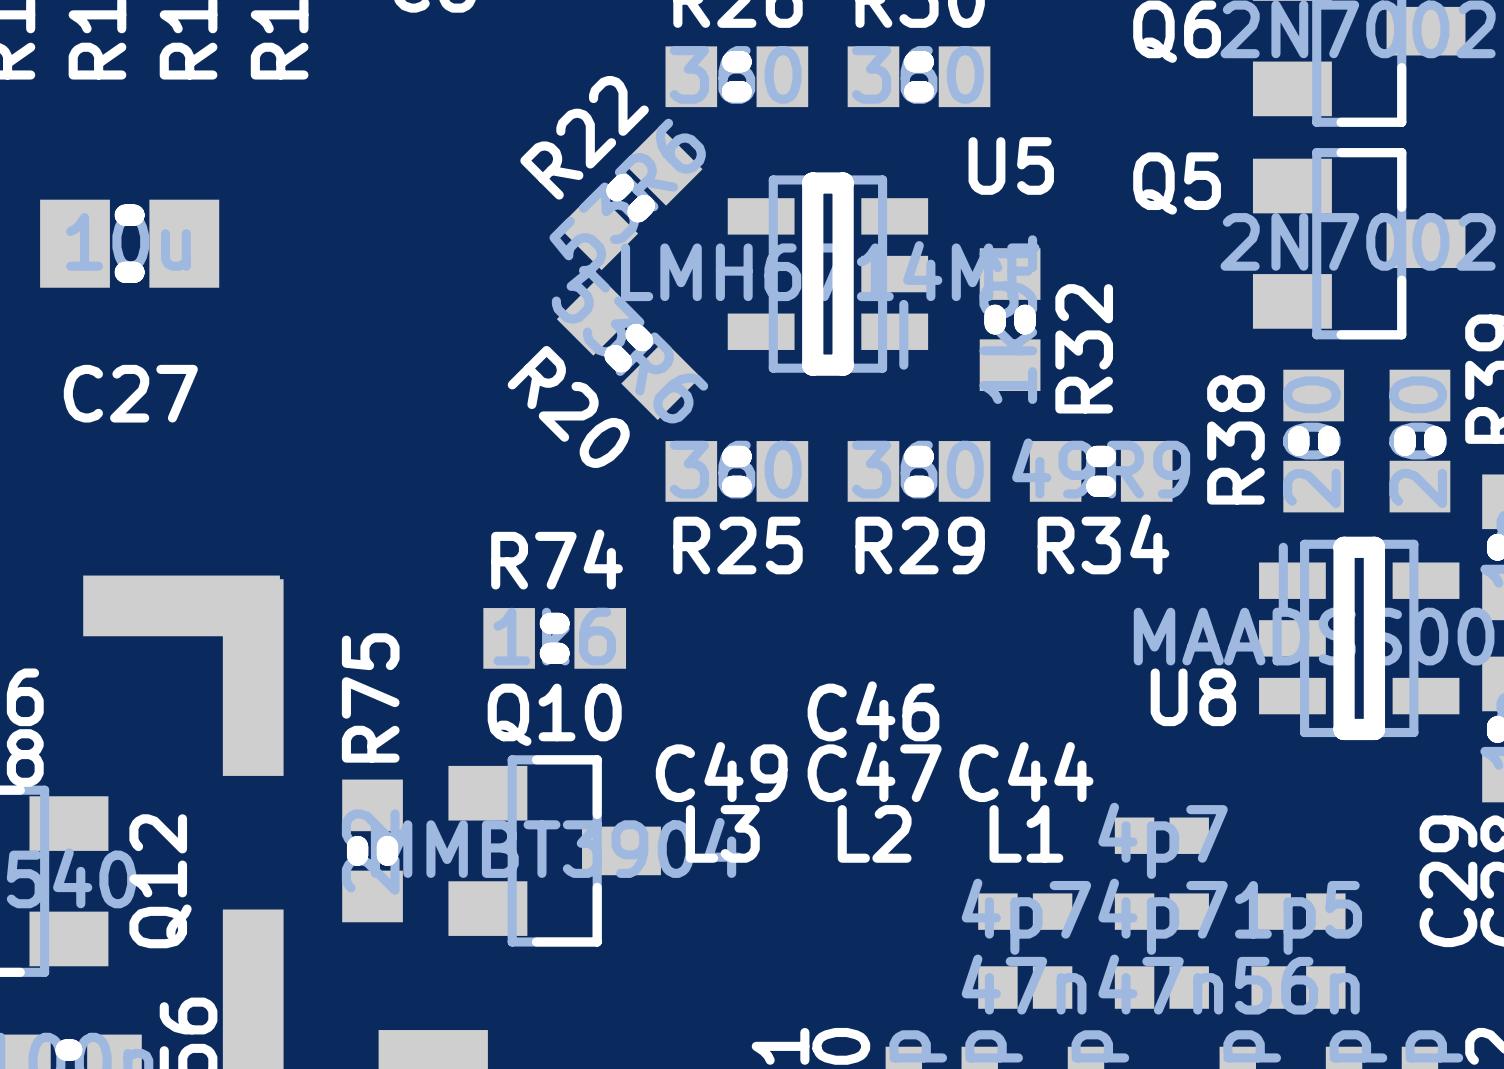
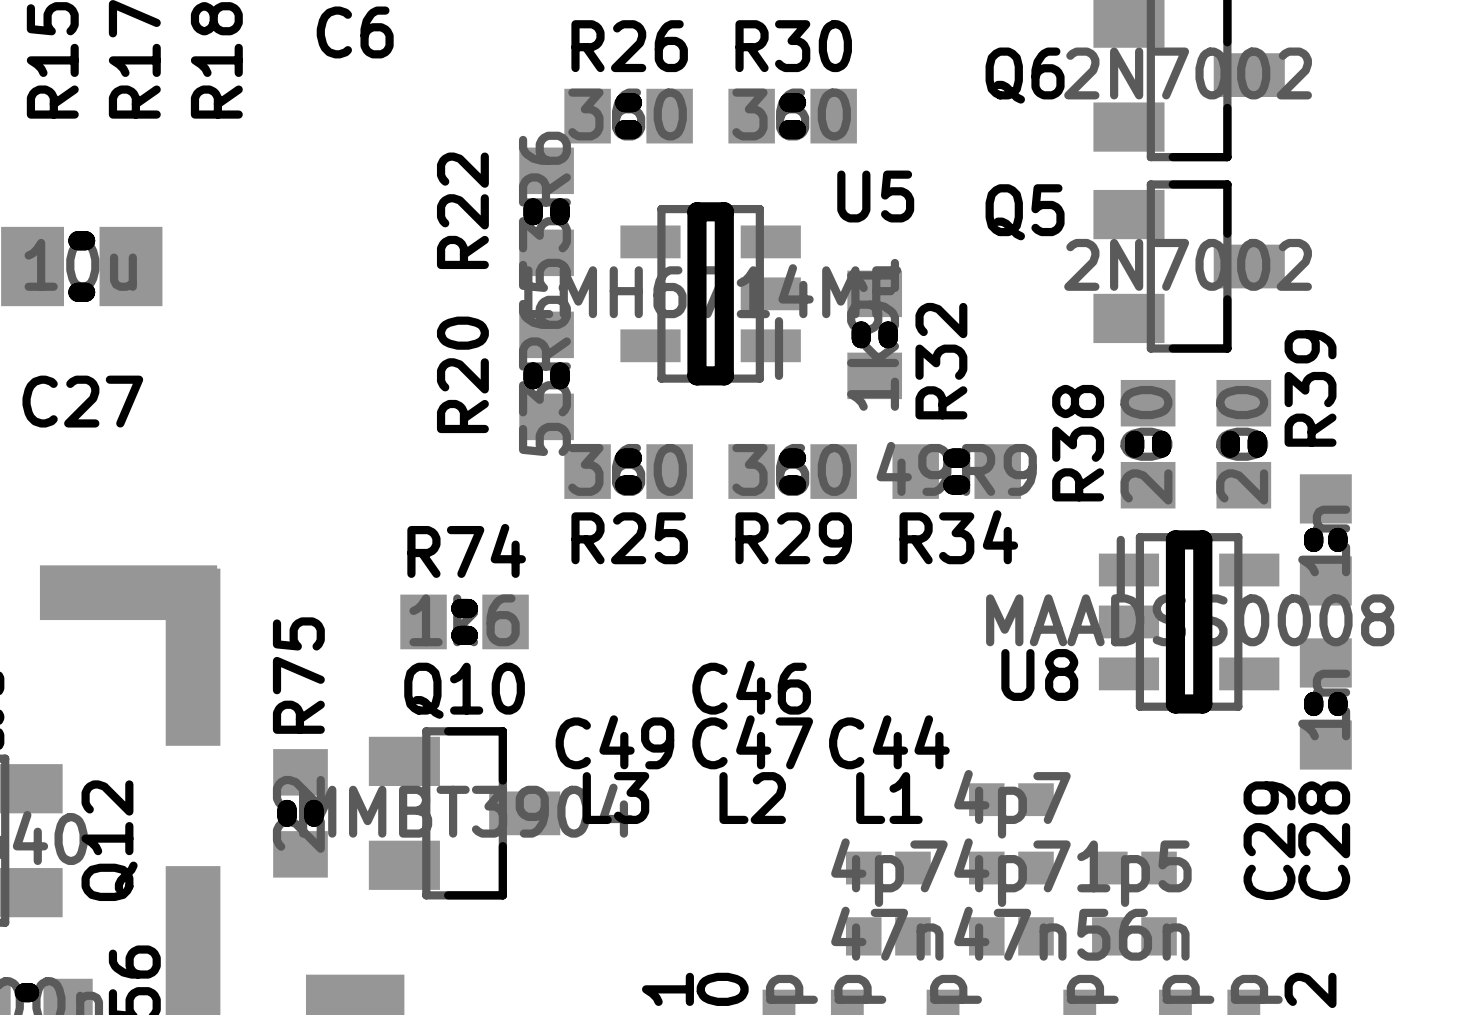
R22 rotation: 0° (630, 198) -> 45° counterclockwise (546, 211)
R20 rotation: 0° (628, 348) -> 45° clockwise (546, 375)

